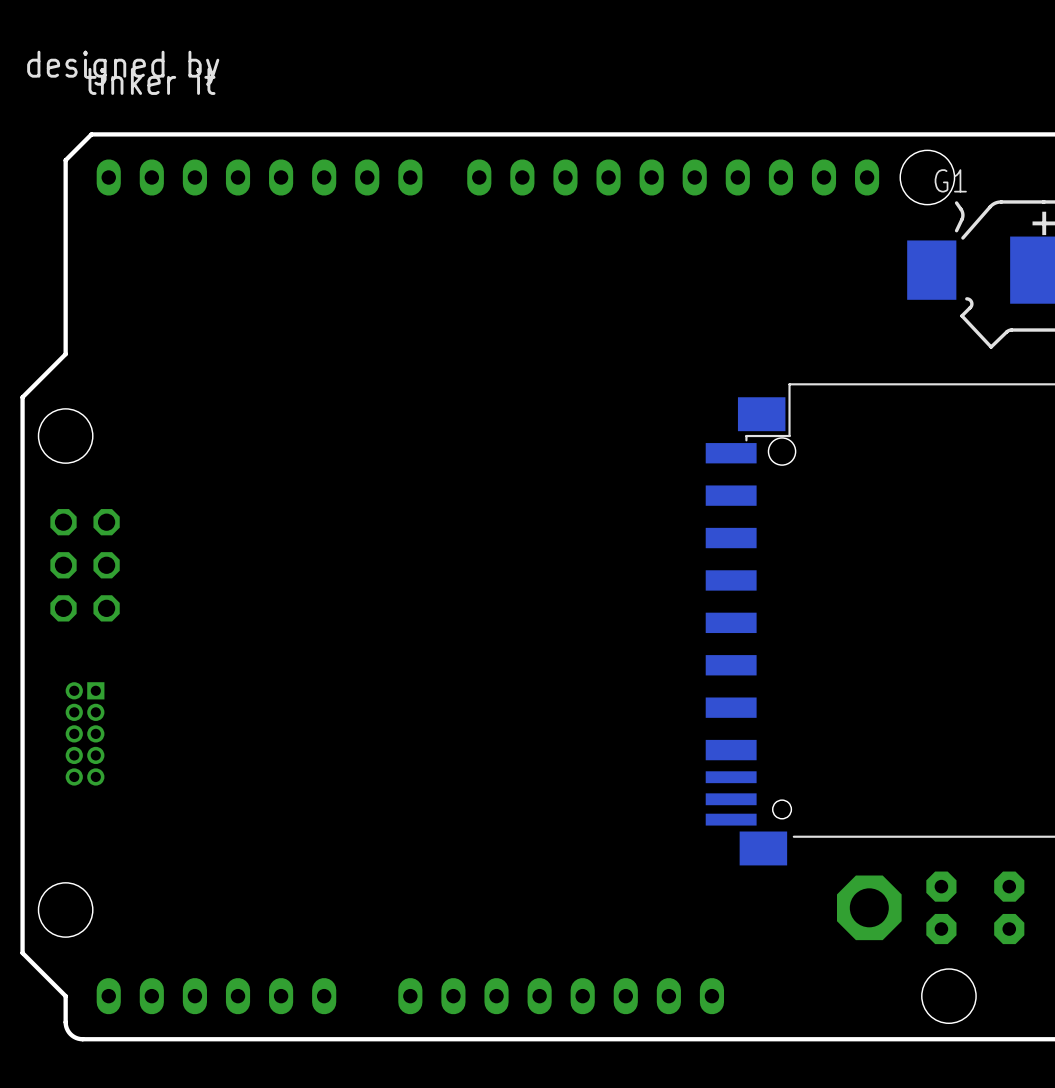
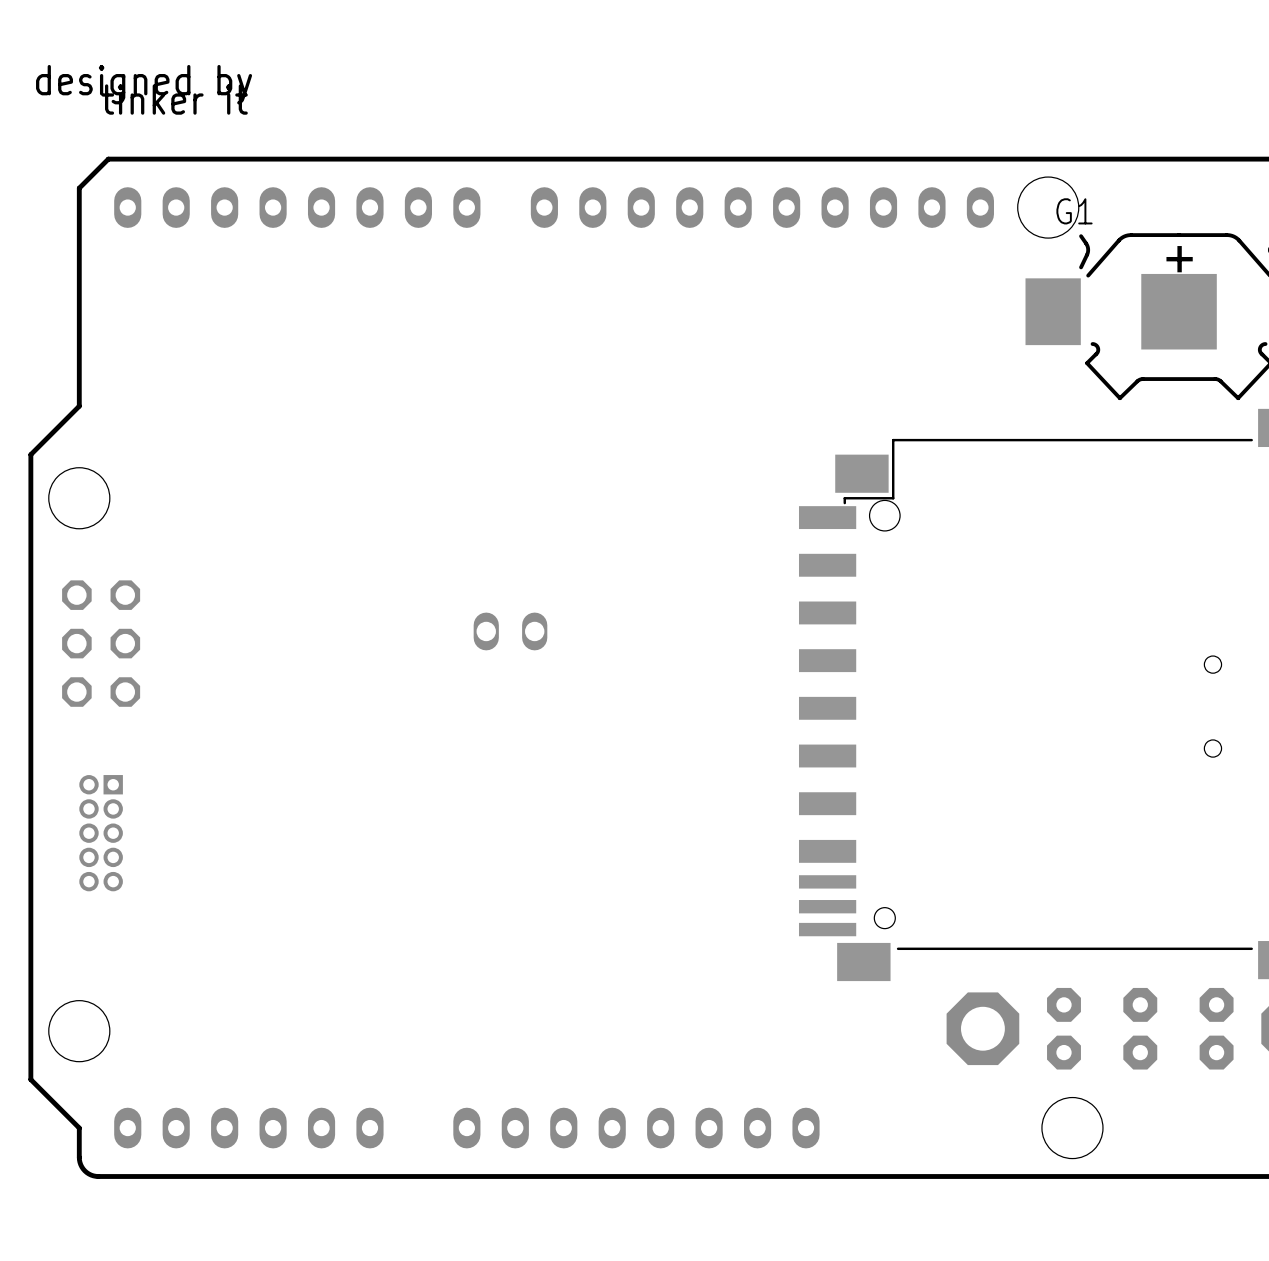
part: none -> (510, 631)

